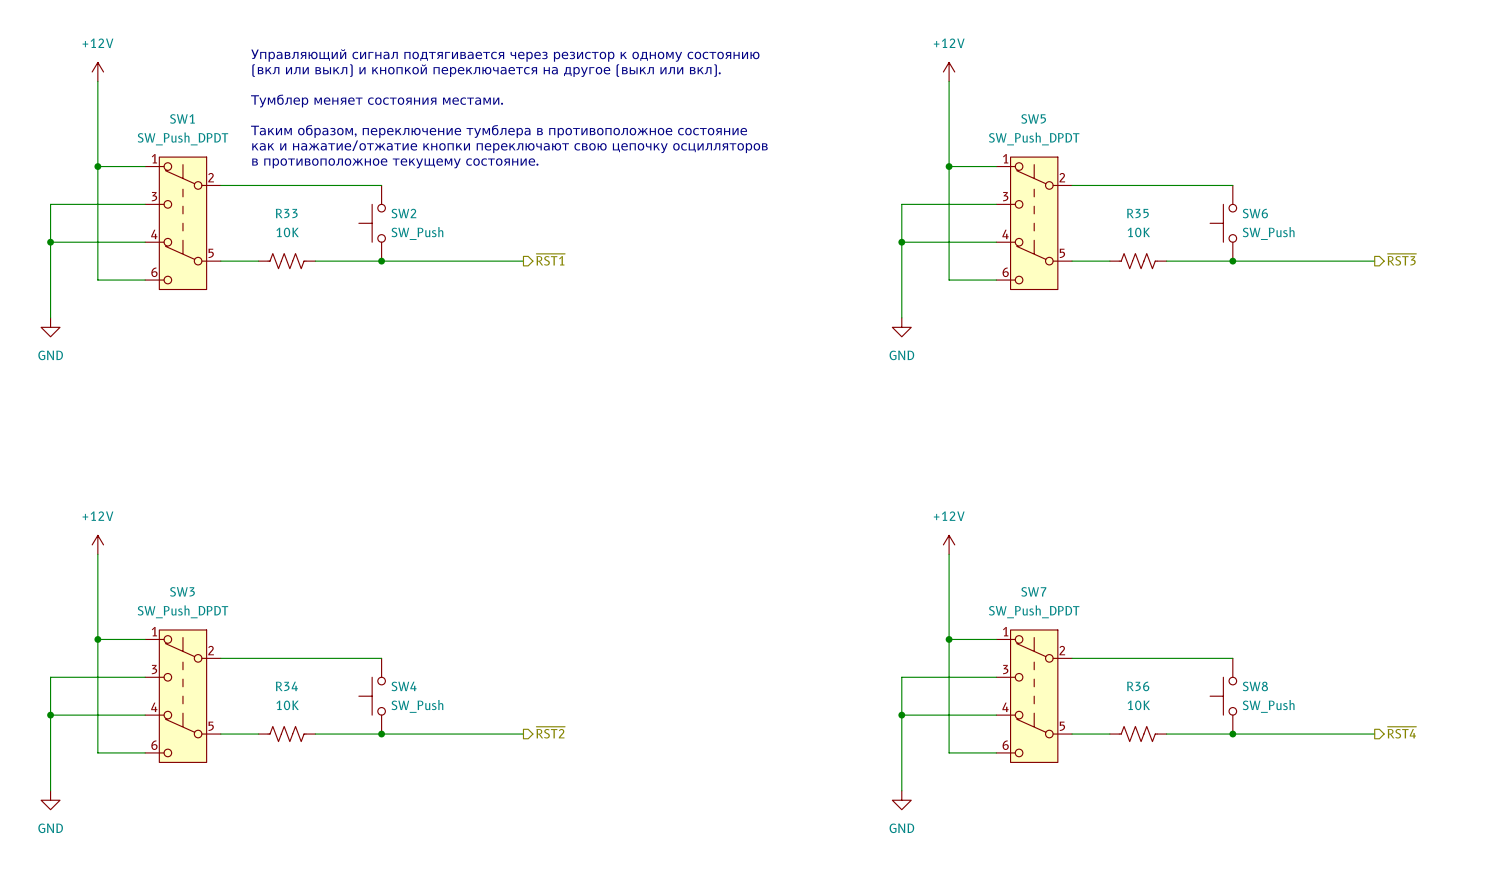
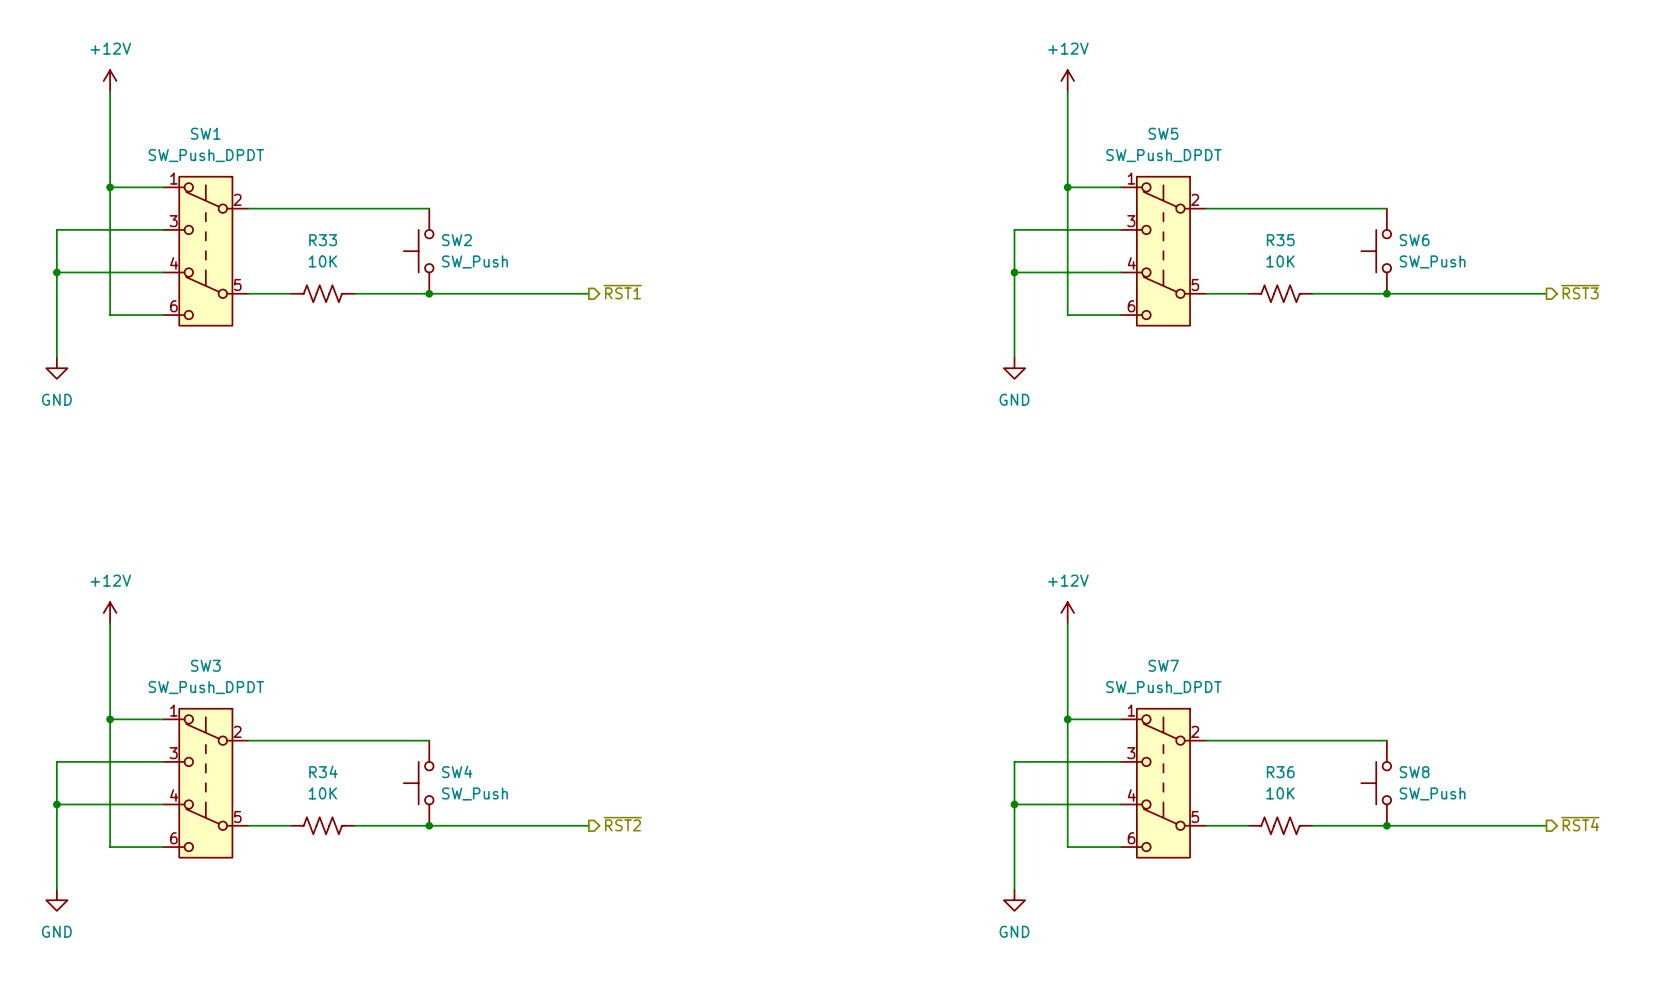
text: Управляющий сигнал подтягивается через резистор к одному состоянию (505, 55) -> none
text: (вкл или выкл) и кнопкой переключается на другое (выкл или вкл). (486, 70) -> none
text: Тумблер меняет состояния местами. (377, 101) -> none
text: Таким образом, переключение тумблера в противоположное состояние (499, 131) -> none
text: как и нажатие/отжатие кнопки переключают свою цепочку осцилляторов (509, 146) -> none
text: в противоположное текущему состояние. (395, 163) -> none

